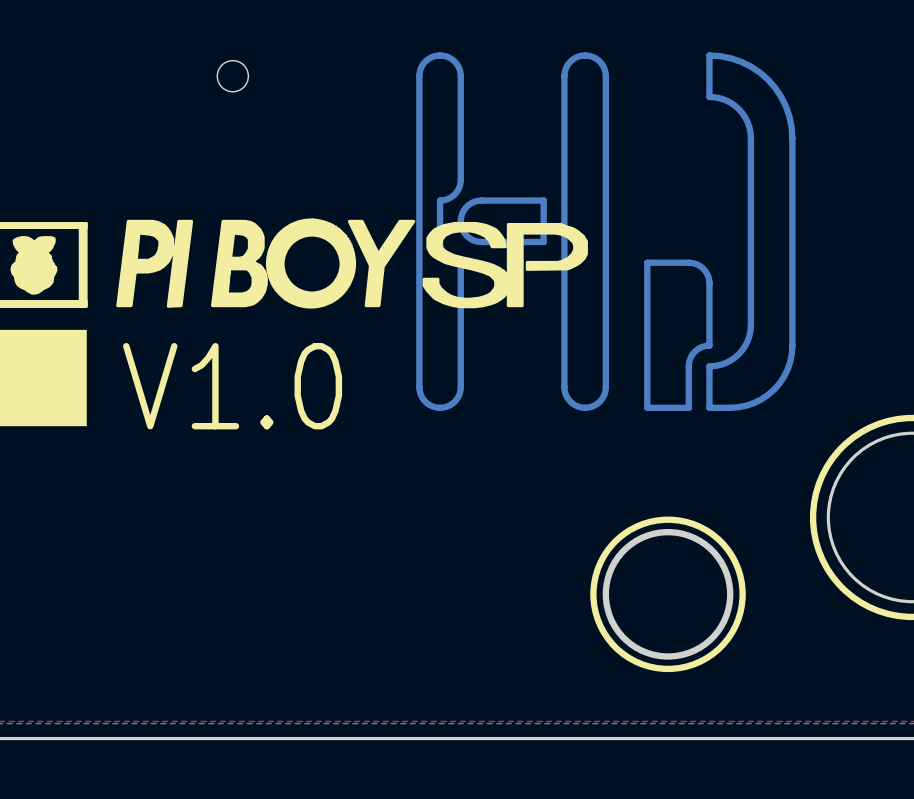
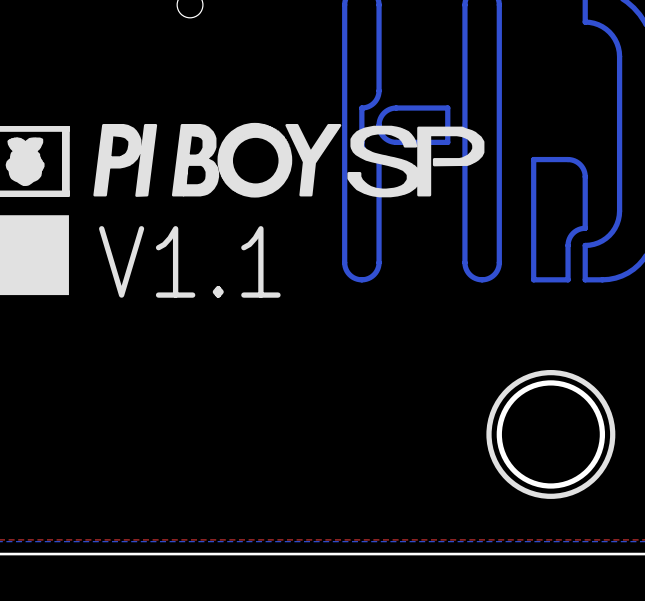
text: V1.0 (232, 386) -> V1.1 (189, 261)

